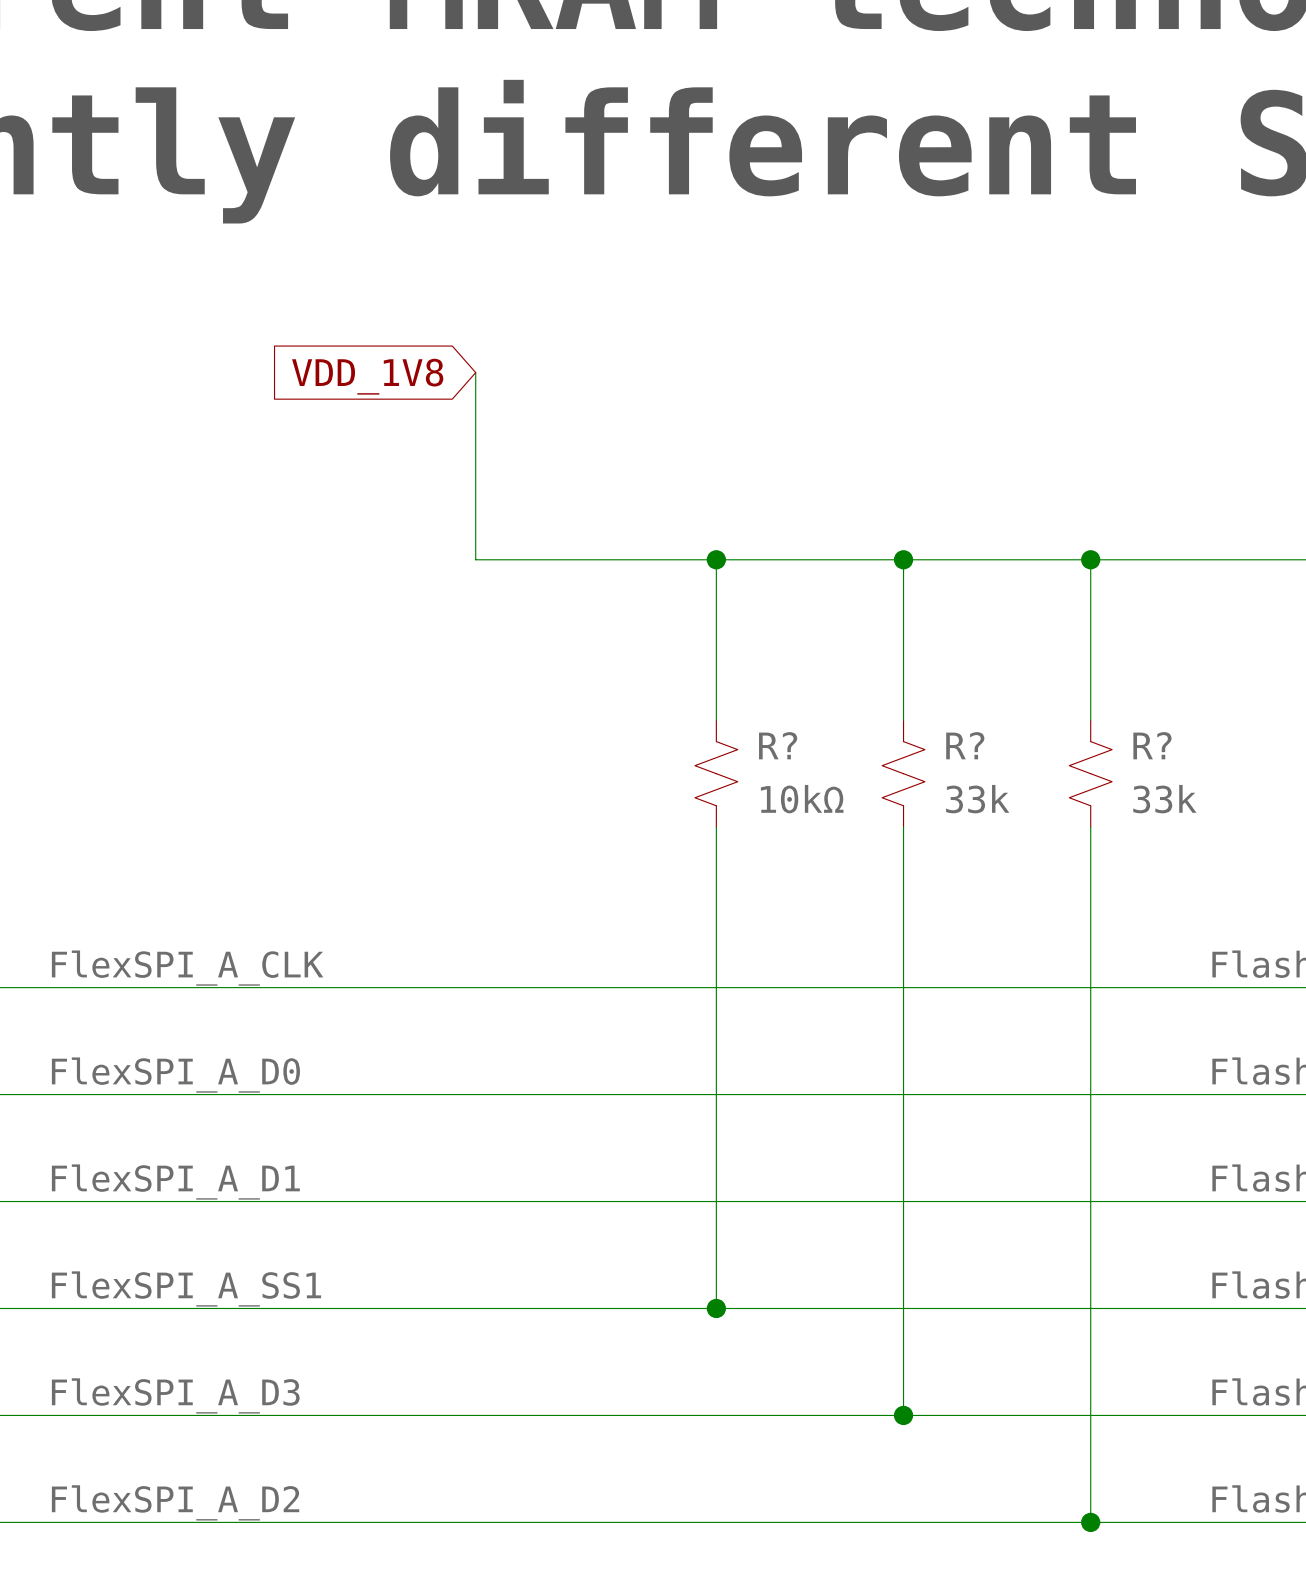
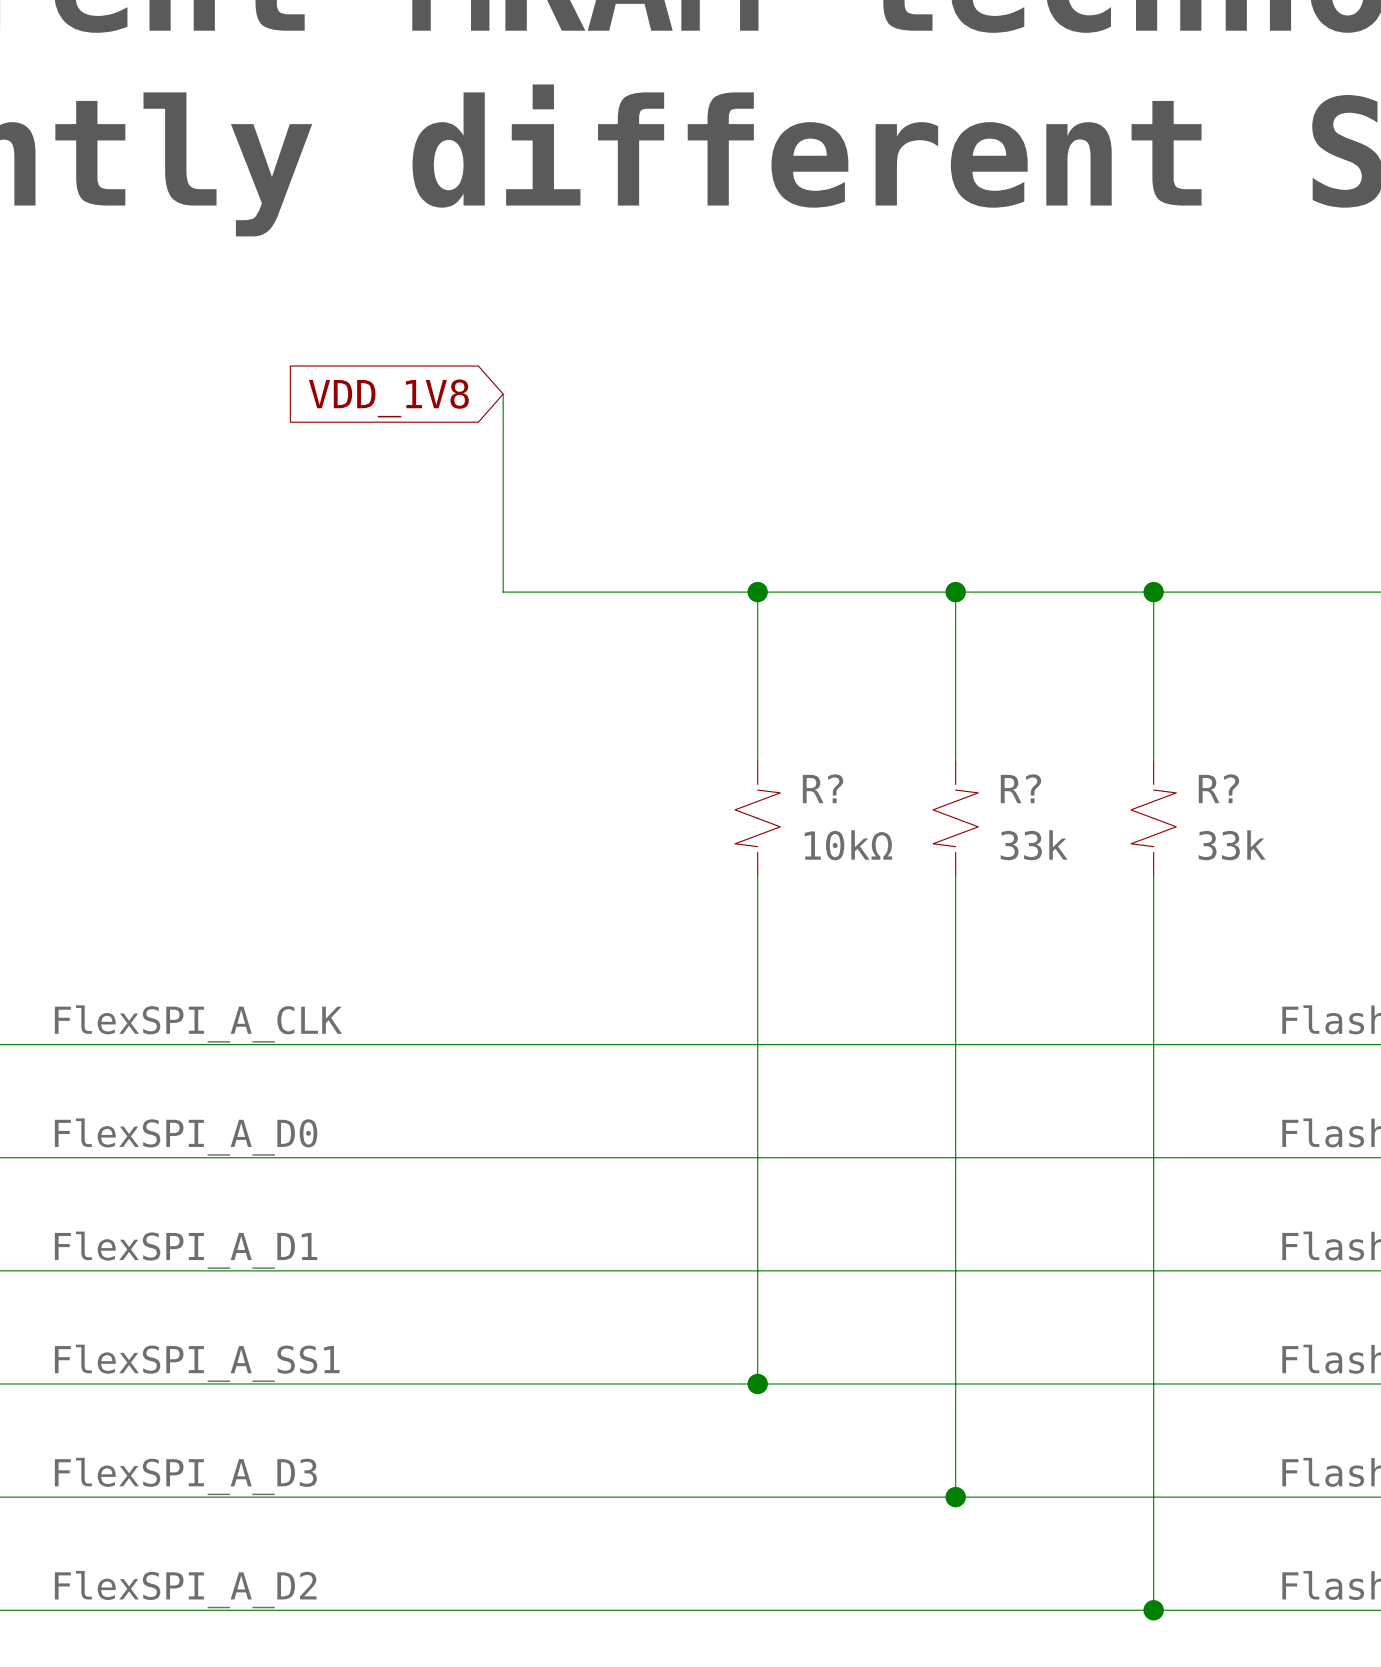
R? symbol: [694, 720, 738, 828] -> [735, 761, 781, 875]
R? symbol: [882, 720, 925, 828] -> [933, 761, 979, 875]
R? symbol: [1069, 720, 1113, 828] -> [1131, 761, 1177, 875]

